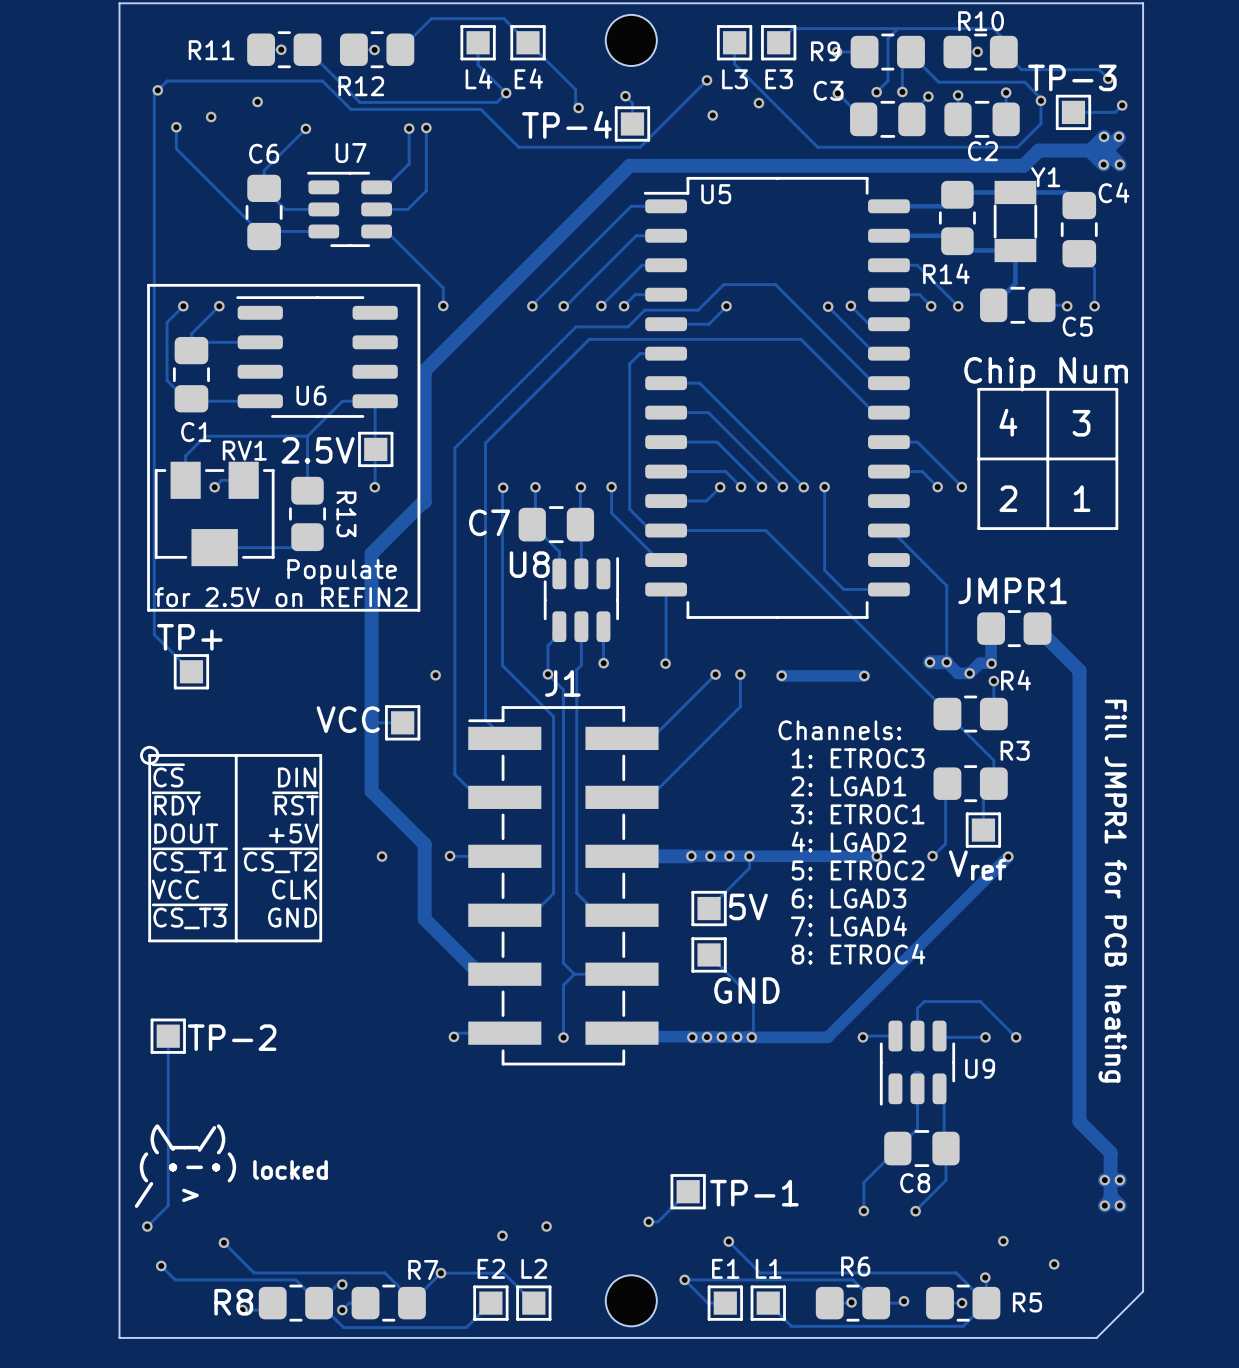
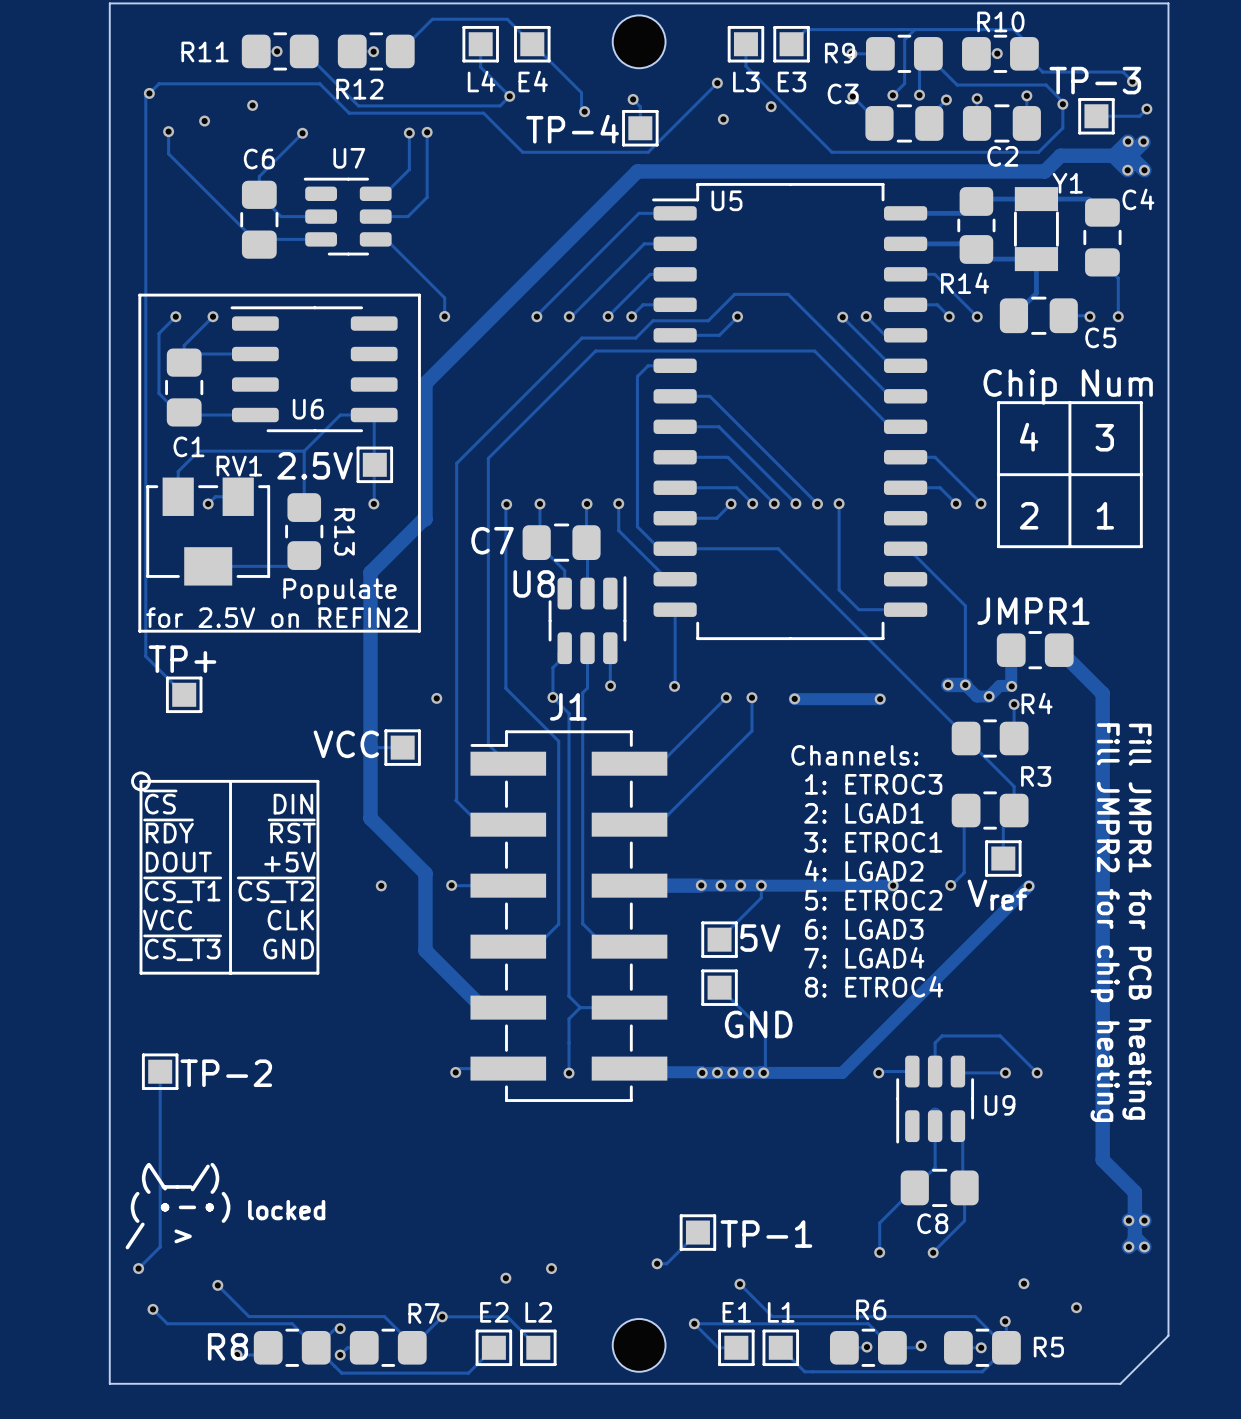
text: none -> Fill JMPR2 for chip heating (1105, 922)

